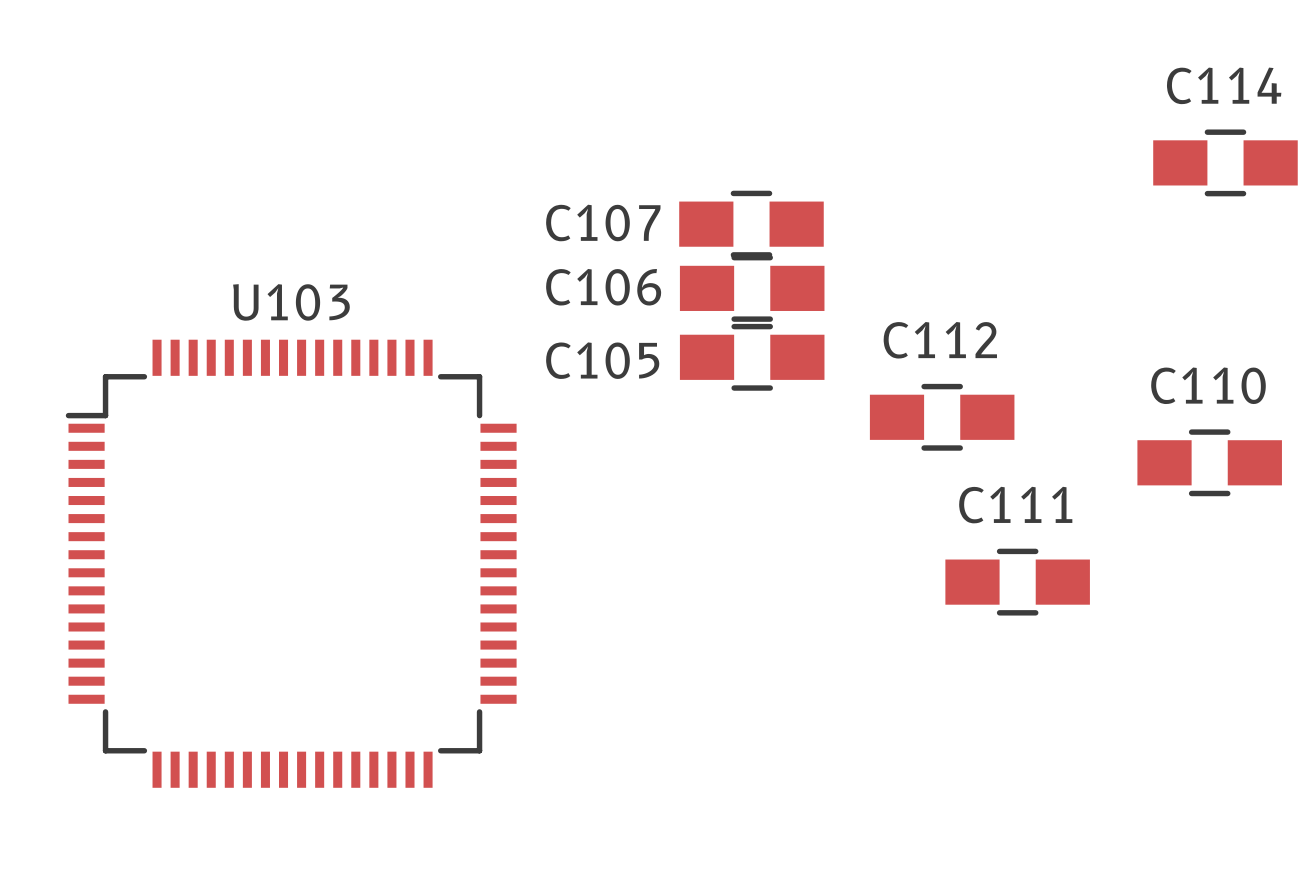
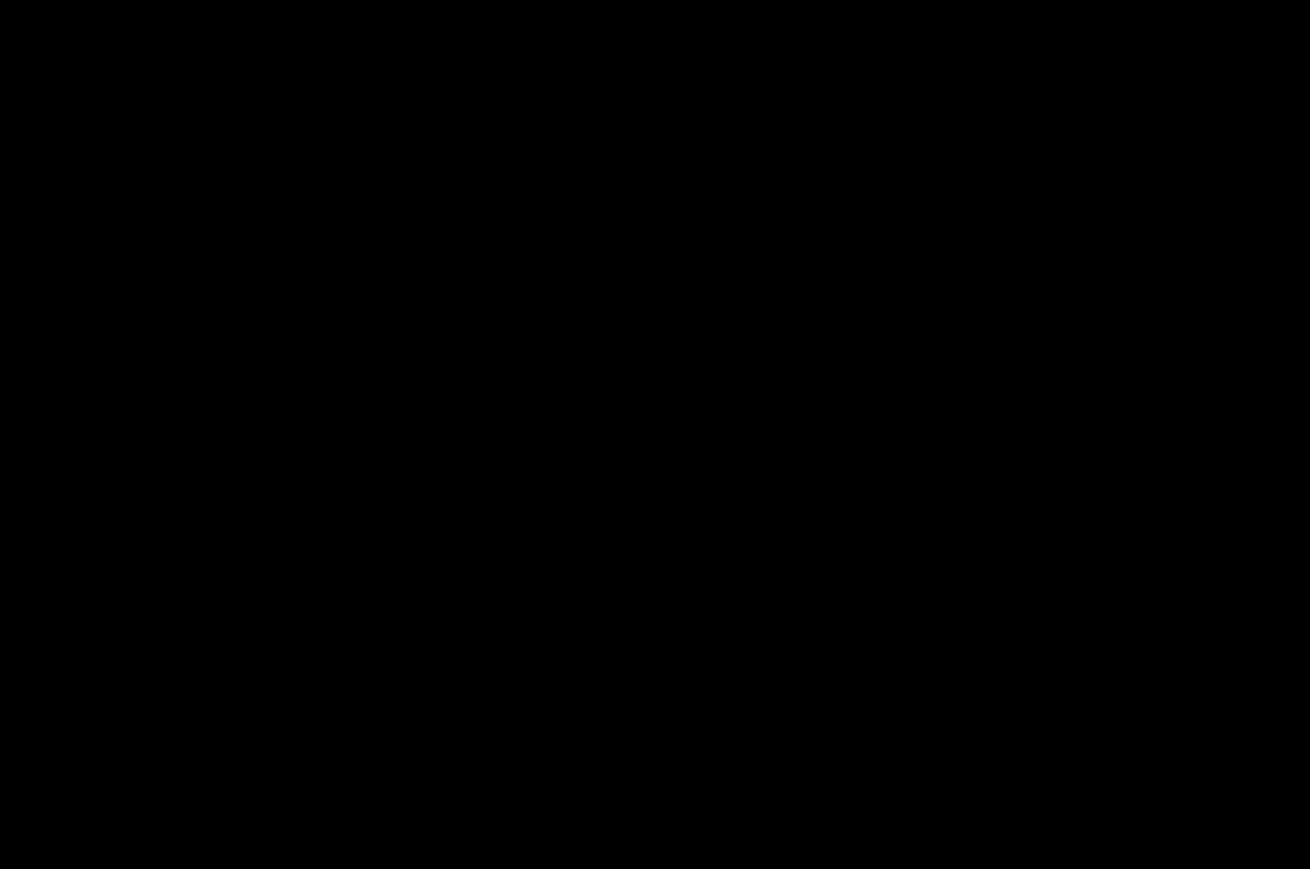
C114: (1225, 162) -> none
C107: (751, 224) -> none
C106: (752, 288) -> none
C105: (752, 357) -> none
C112: (942, 417) -> none
C110: (1209, 462) -> none
U103: (291, 563) -> none
C111: (1017, 582) -> none

